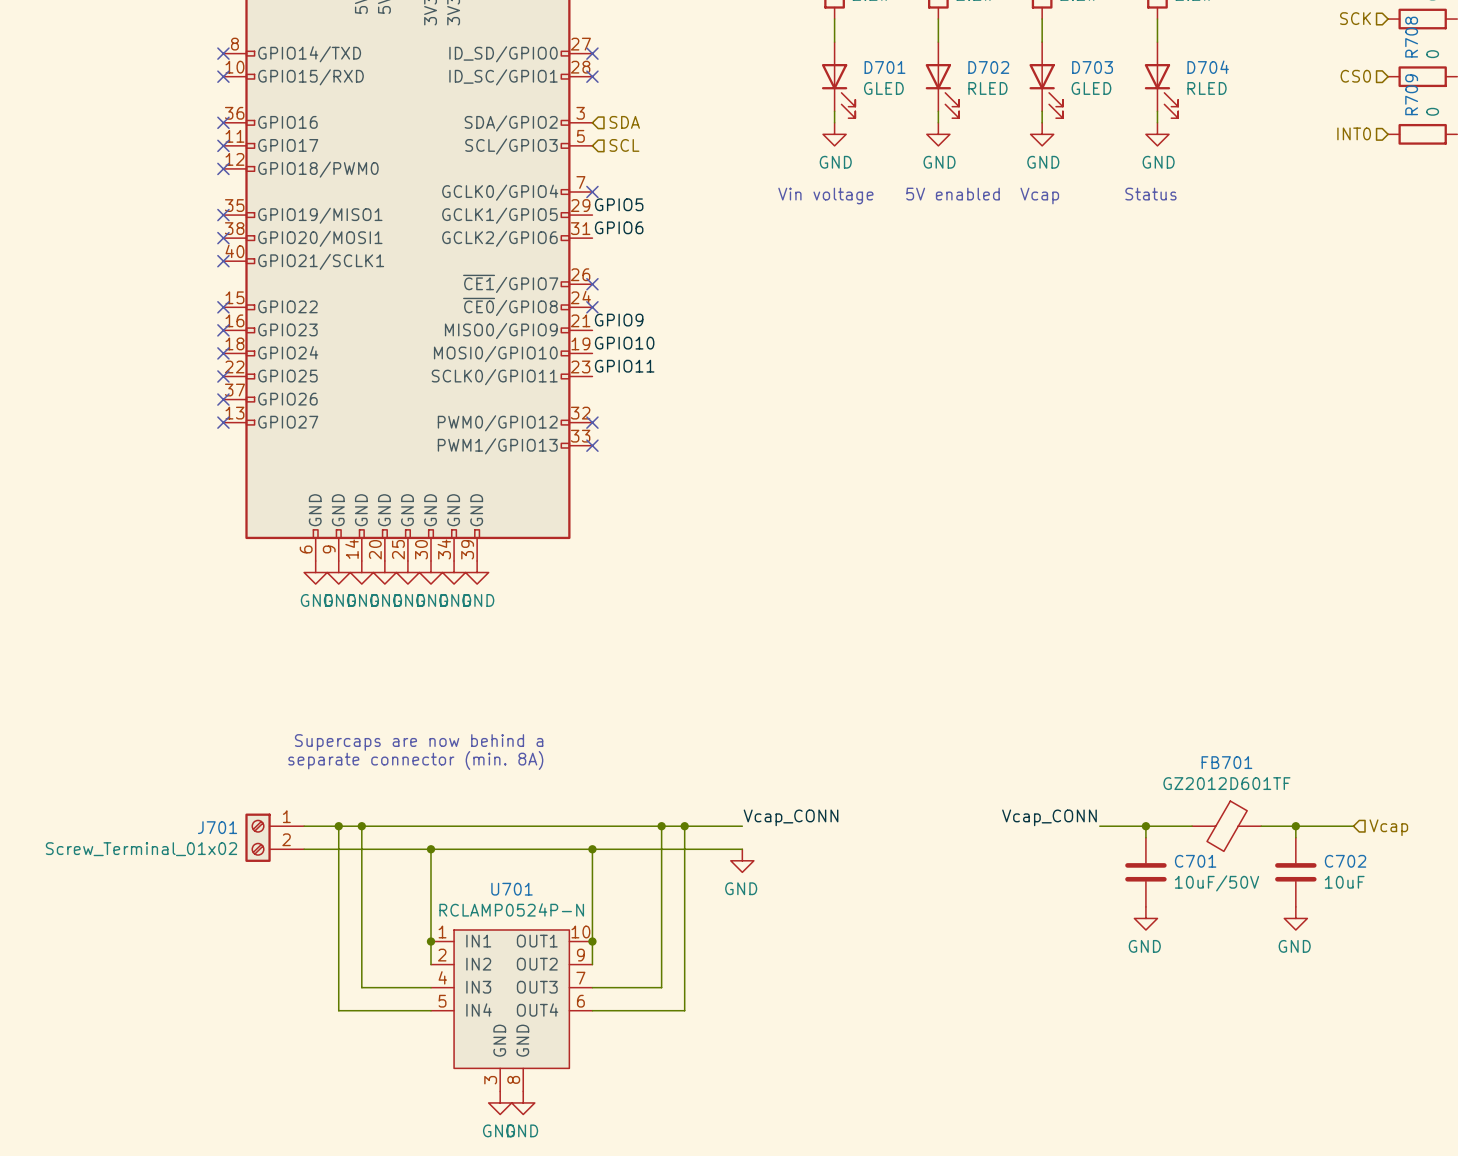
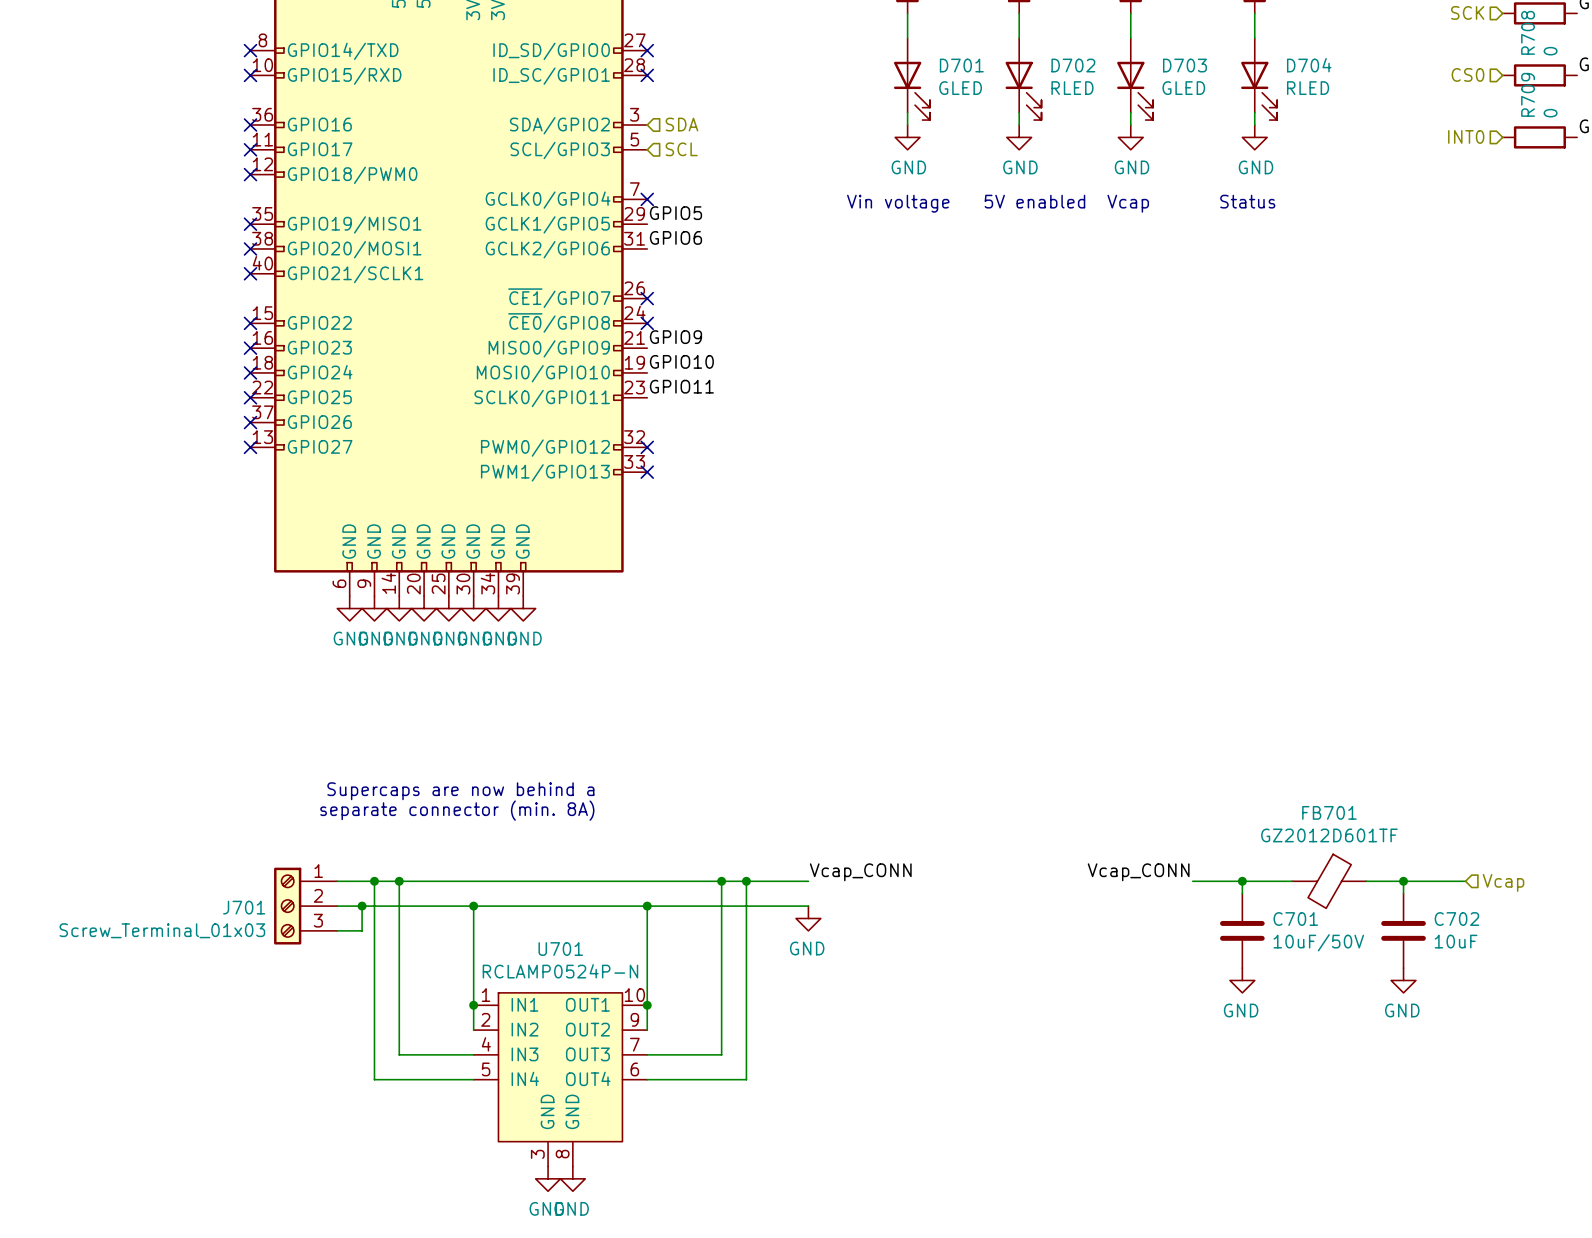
J701 symbol: [245, 813, 305, 862] -> [274, 867, 338, 945]
J701 value: Screw_Terminal_01x02 (141, 849) -> Screw_Terminal_01x03 (162, 930)
wire: none -> (362, 906) (362, 930) (337, 930)
junction: none -> (362, 906)

